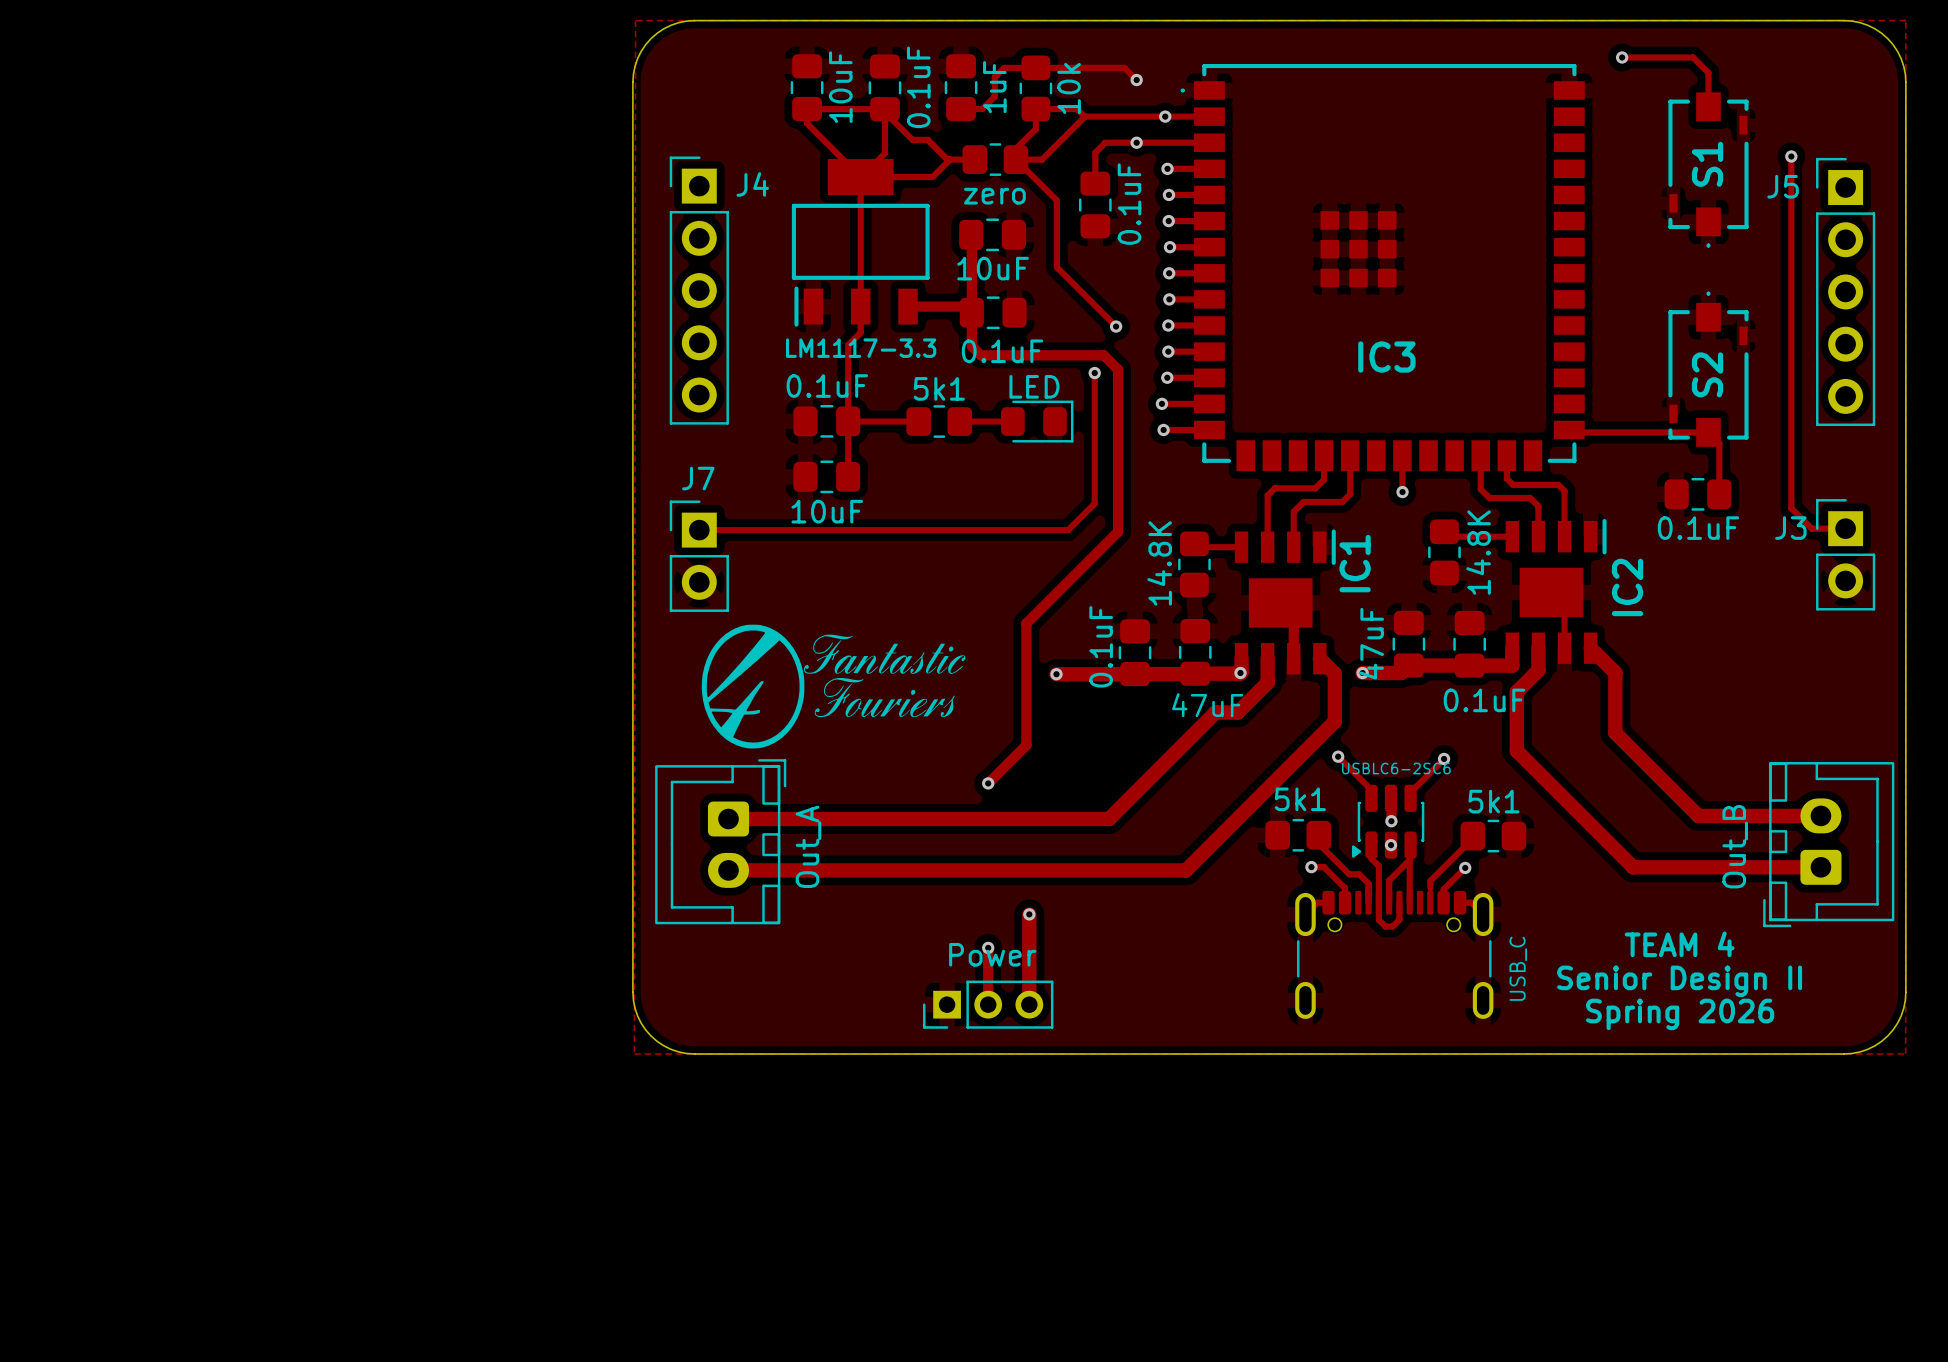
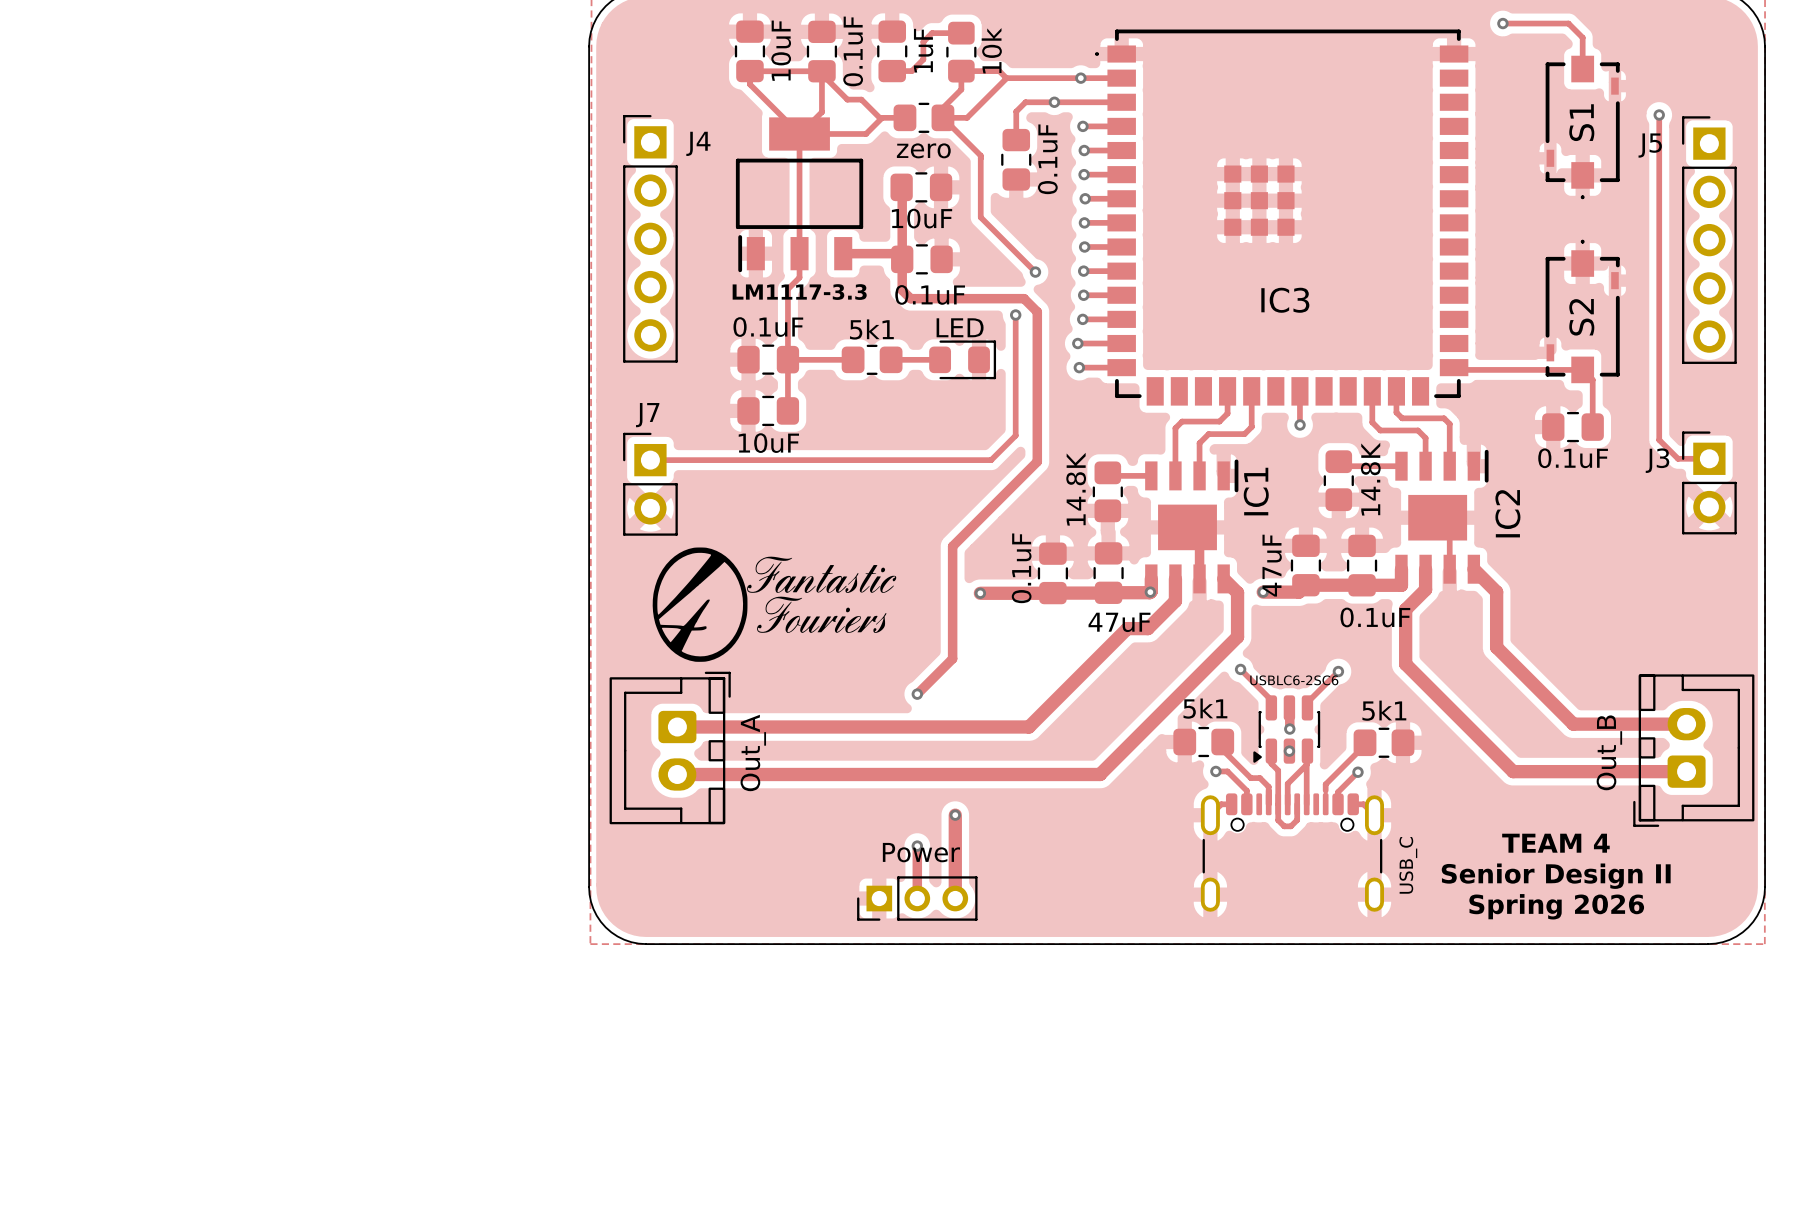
track: (1035, 67) (1124, 67) (1136, 80) -> none
via: (1136, 80) -> none

